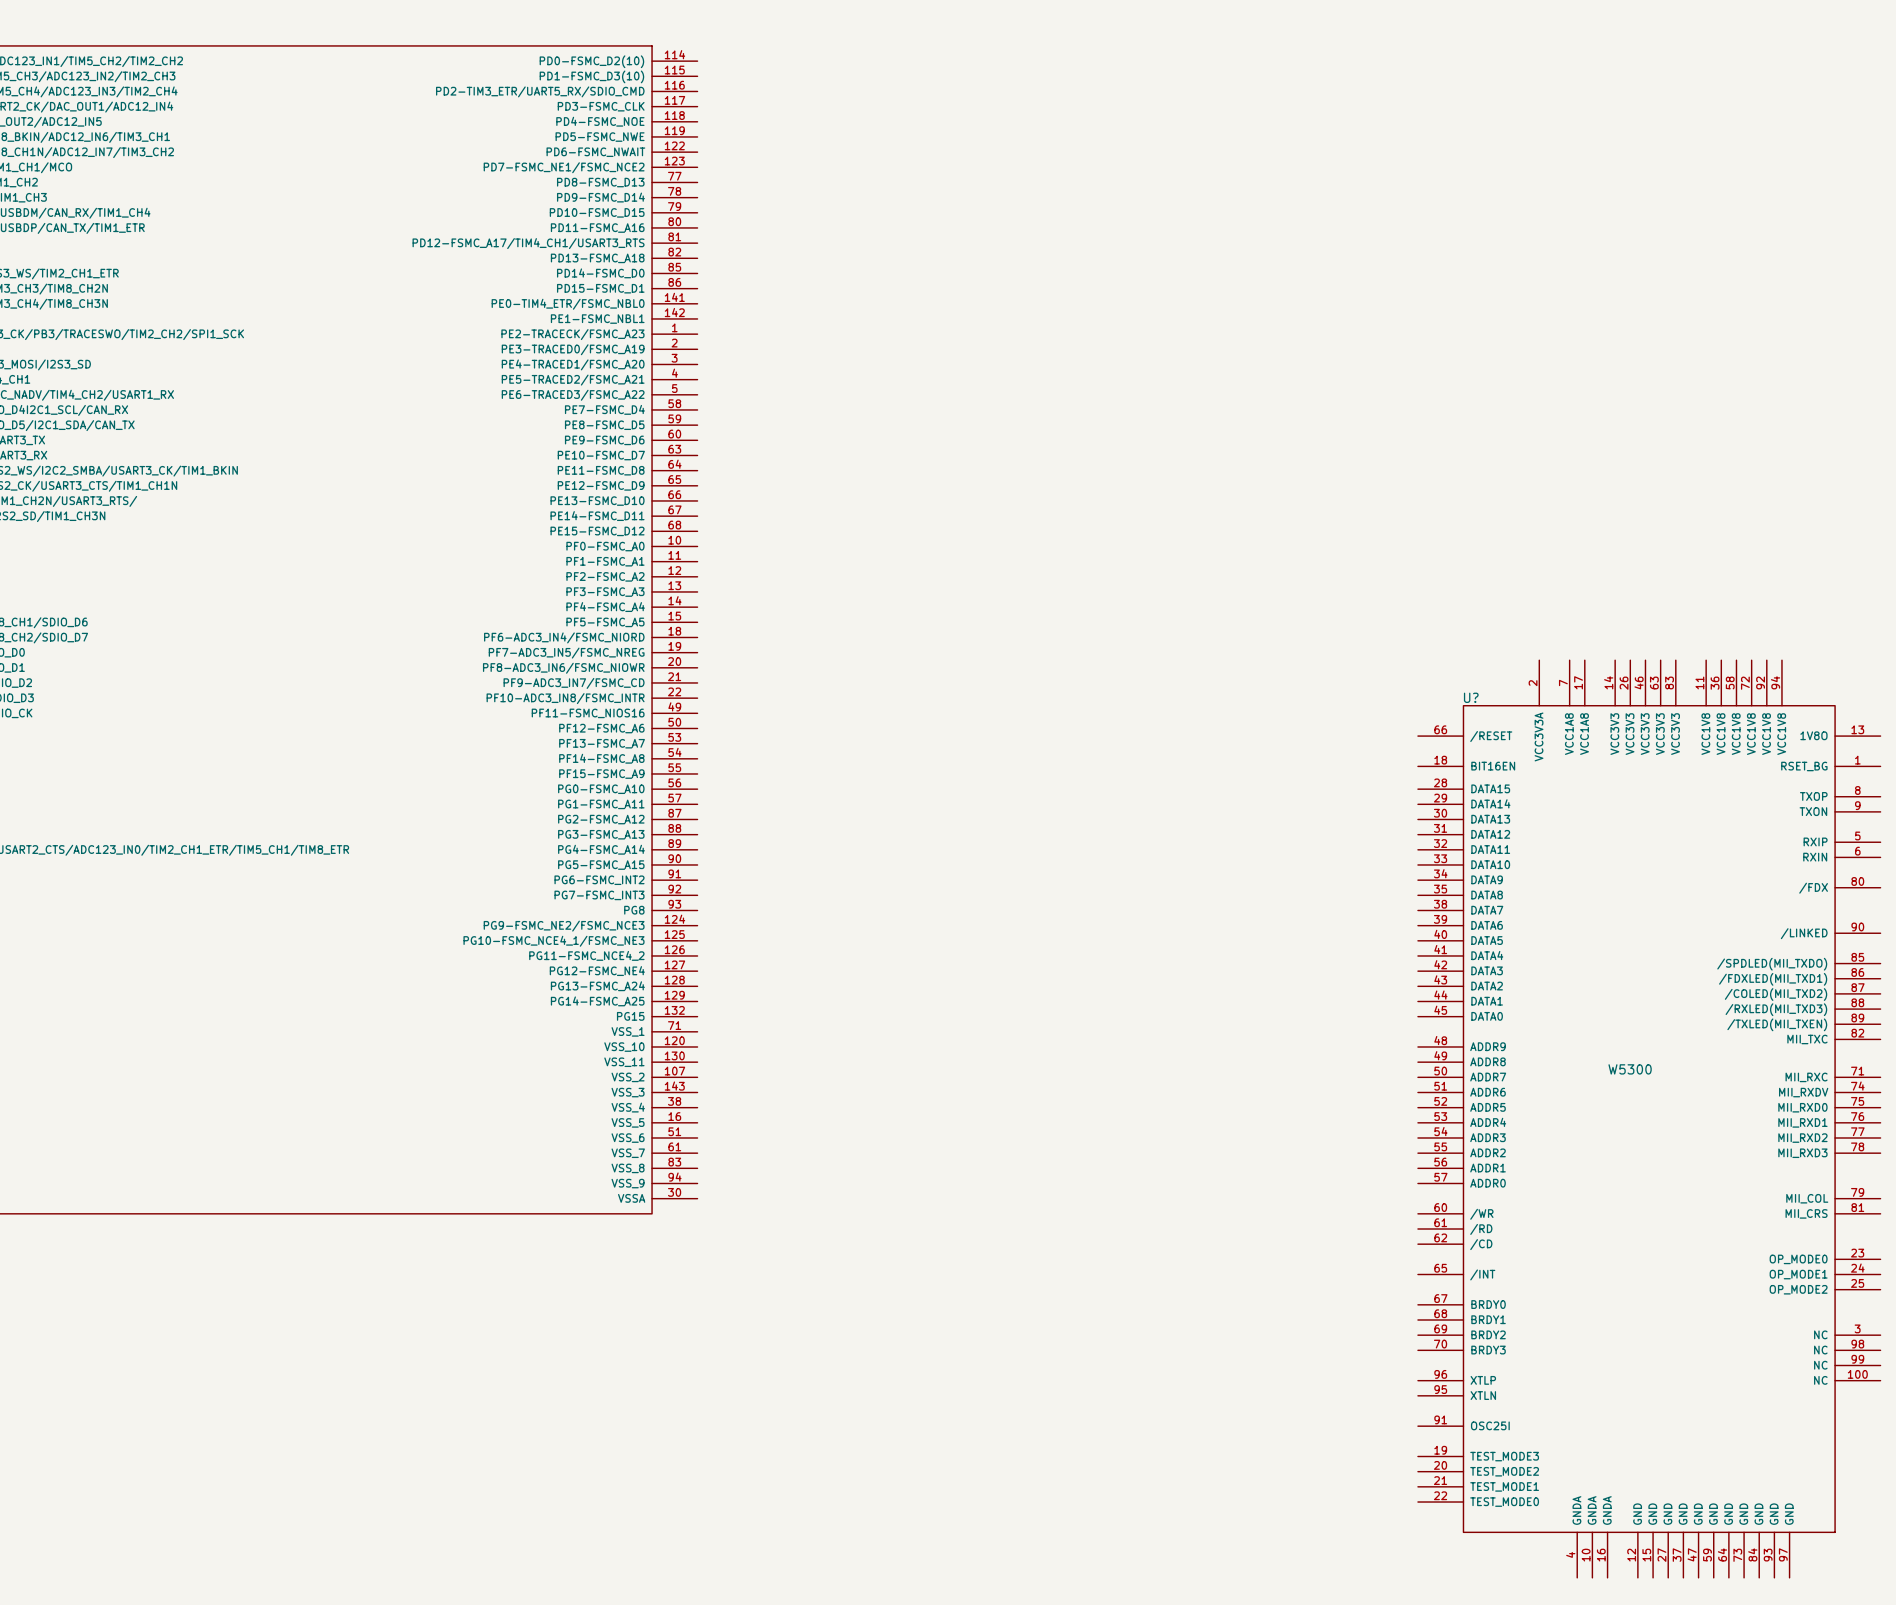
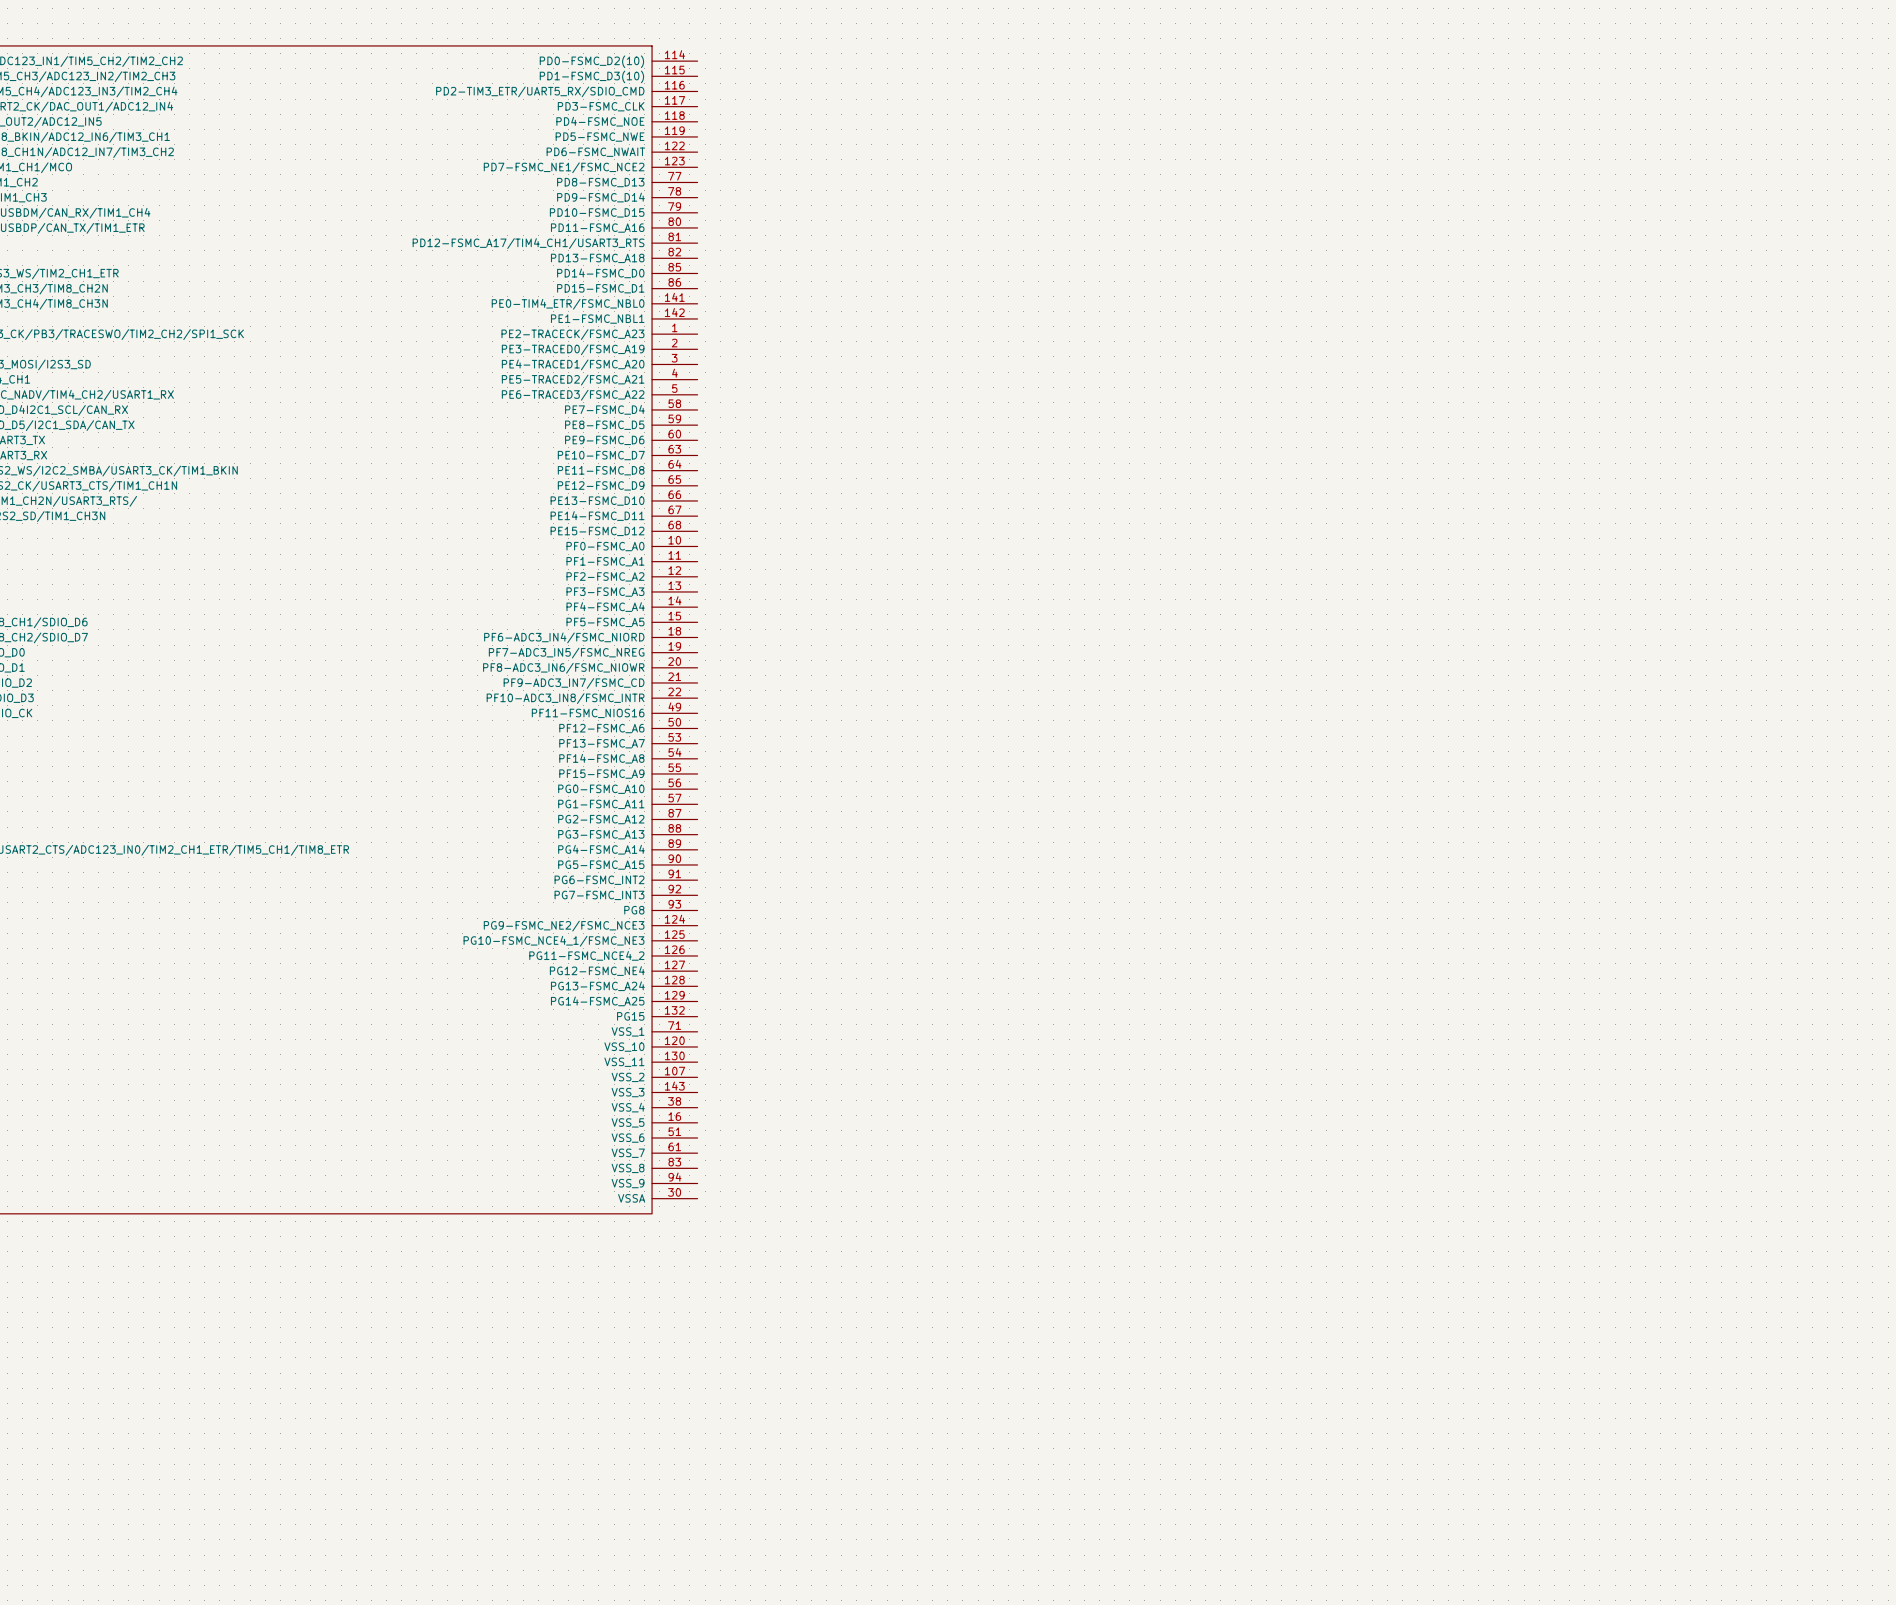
U?: W5300 (1649, 1119) -> none

